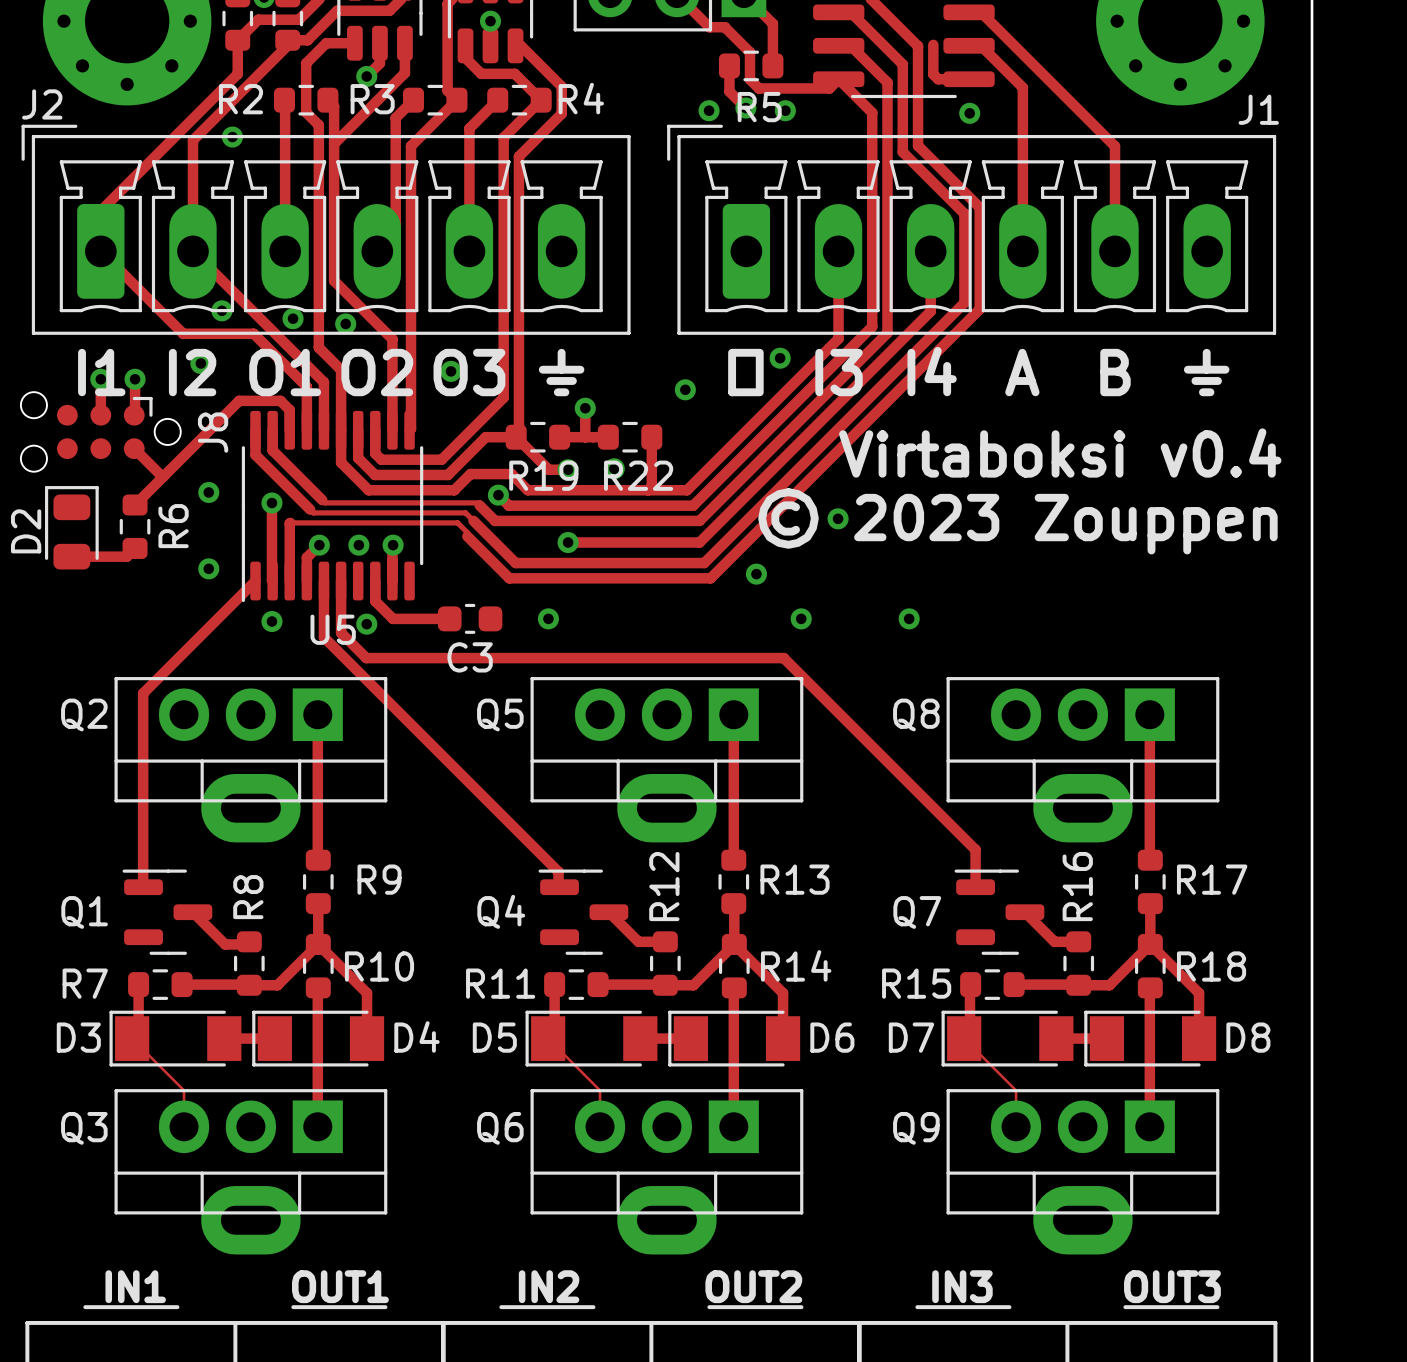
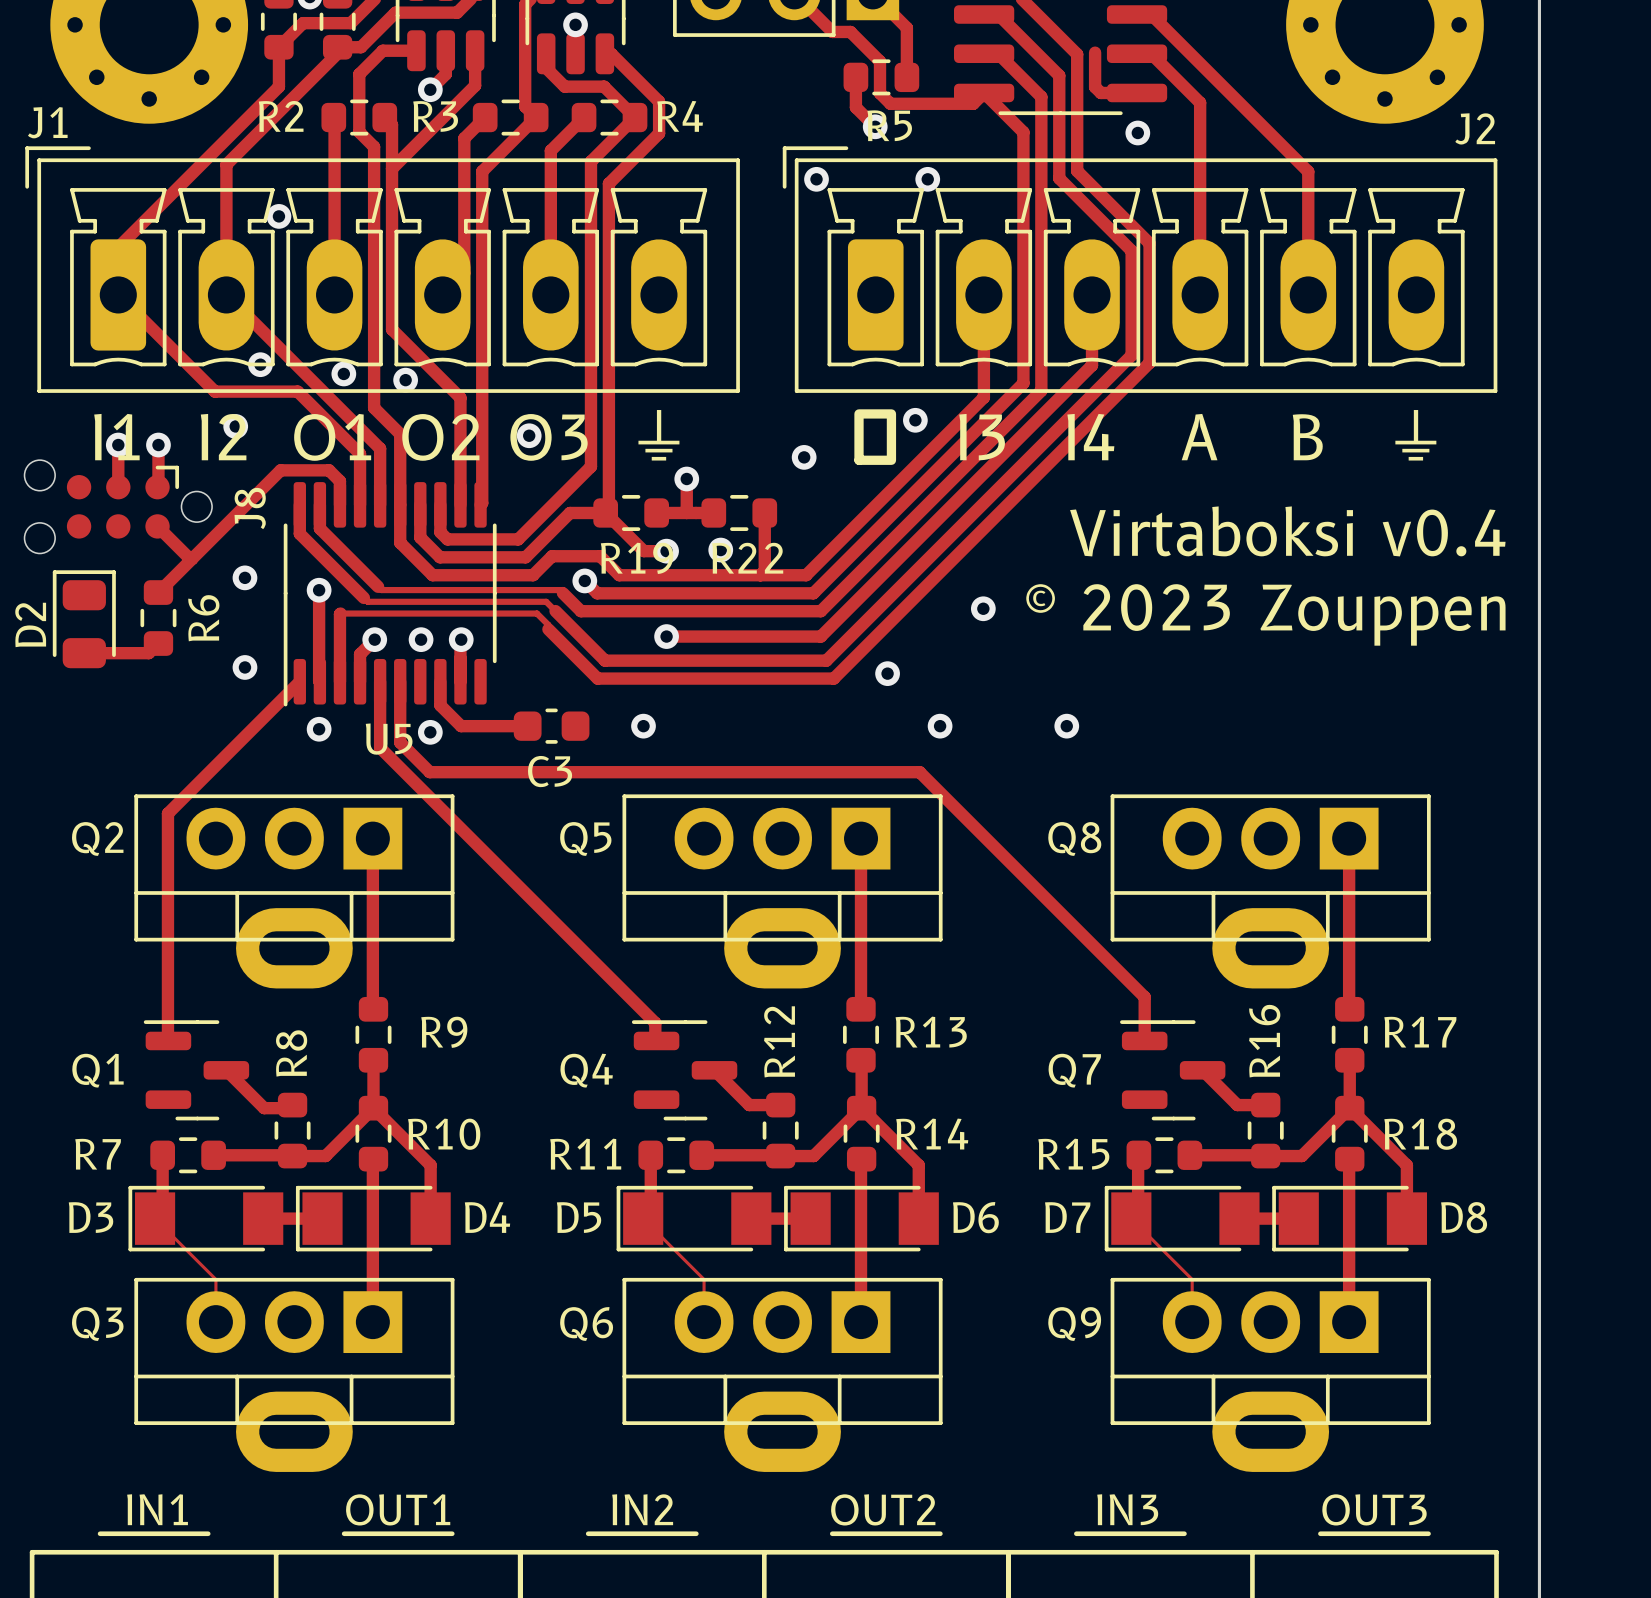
J2 name: J2 (42, 104) -> J1 (47, 122)
J1 name: J1 (1258, 109) -> J2 (1475, 128)
via position: (709, 110) -> (816, 179)
via position: (785, 110) -> (927, 179)
via position: (232, 137) -> (278, 216)

